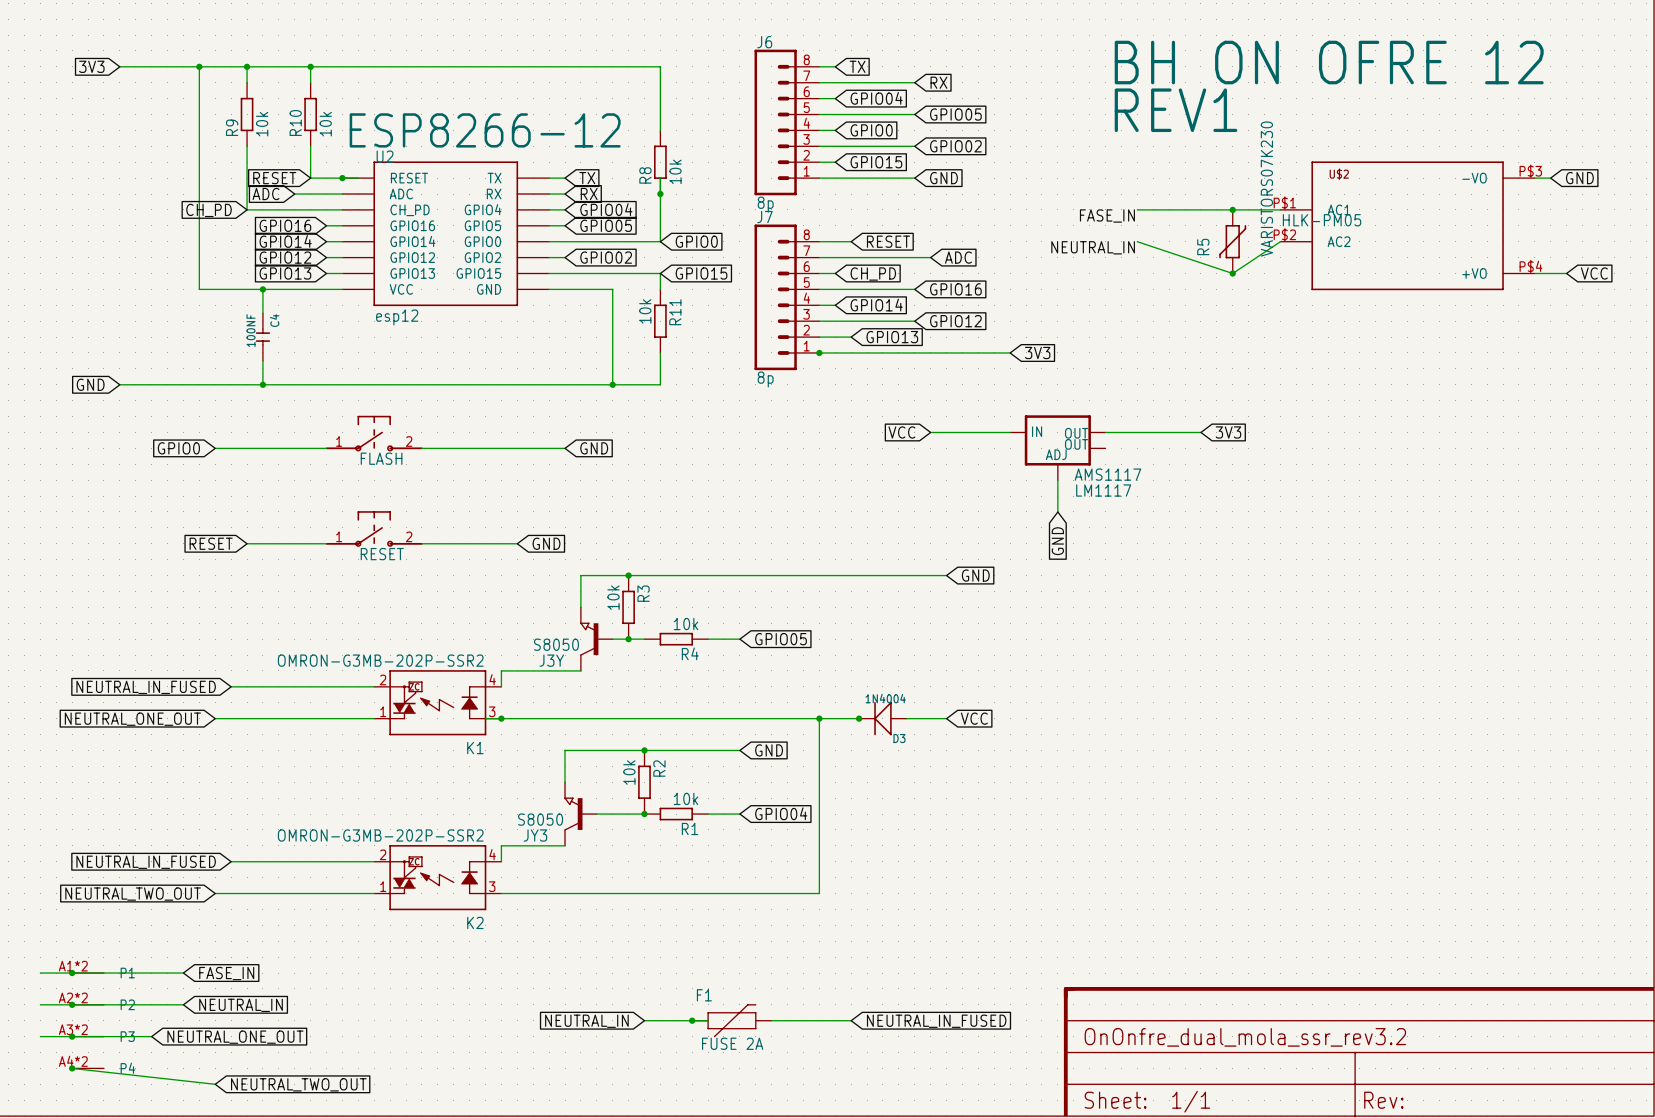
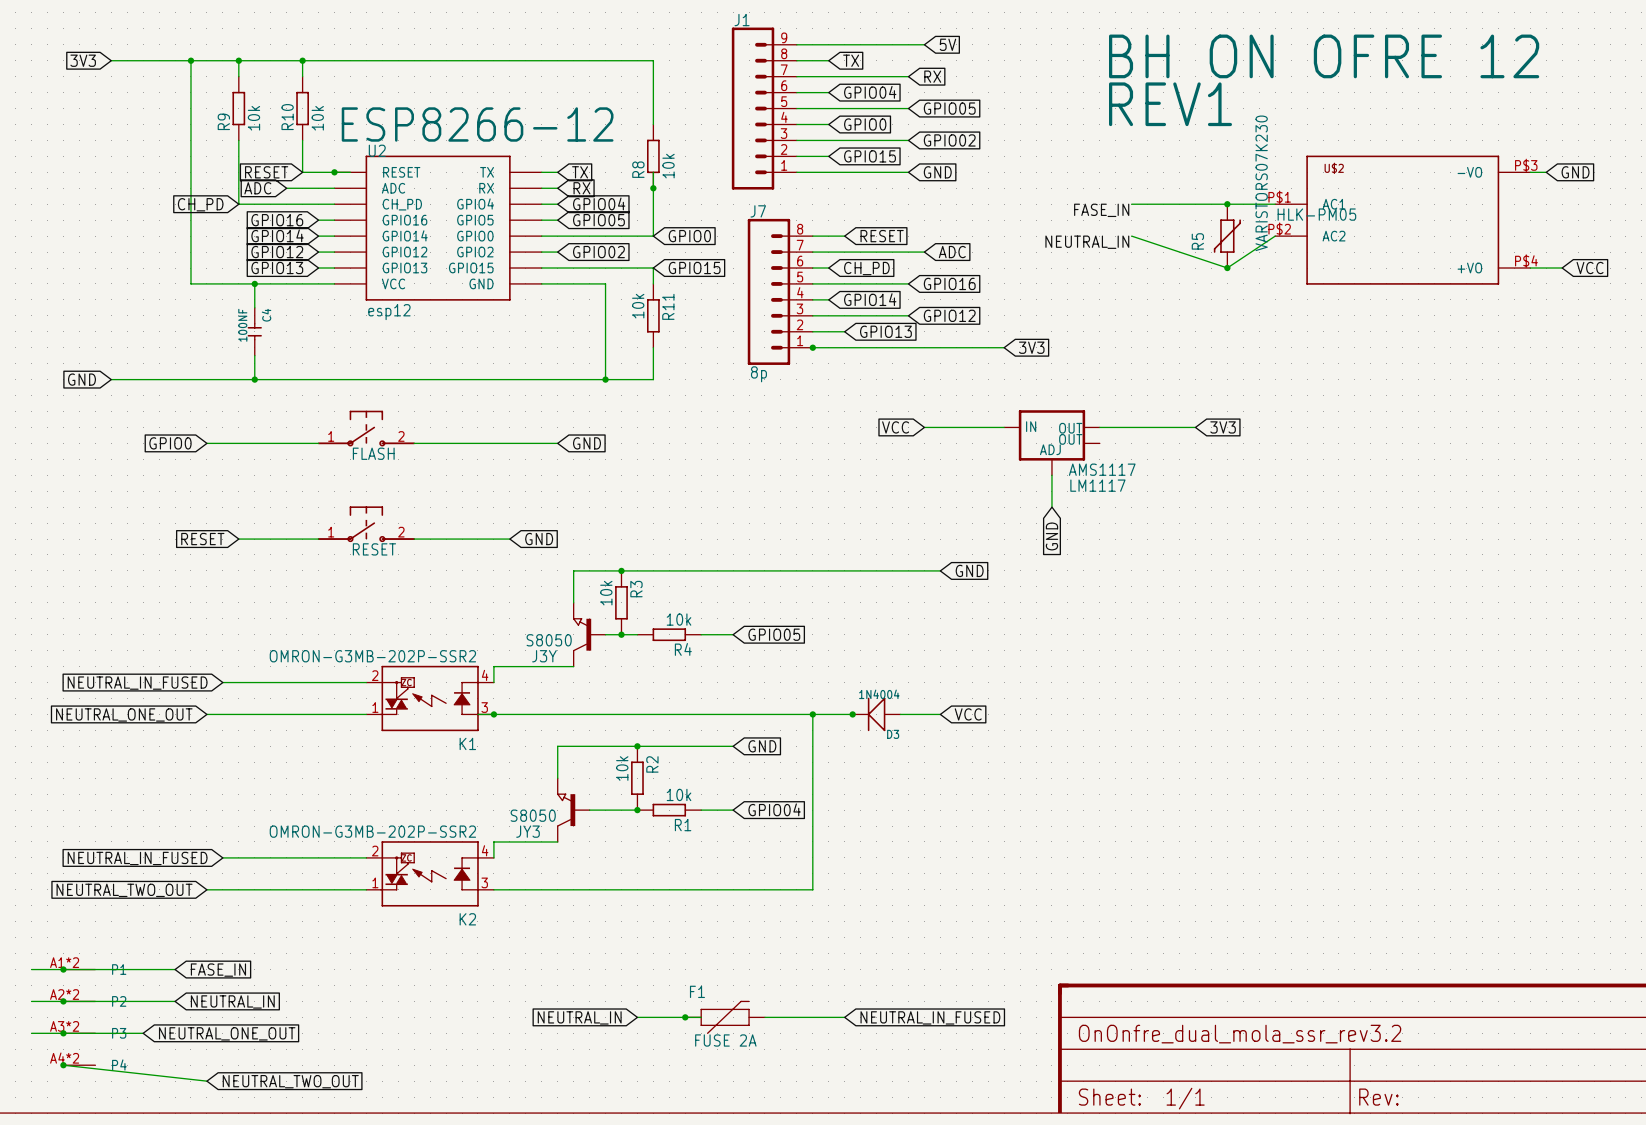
wire: none -> (796, 44) (924, 44)
global label: none -> 5V (947, 44)
J1: none -> (764, 108)
J6: 8p (786, 122) -> none

